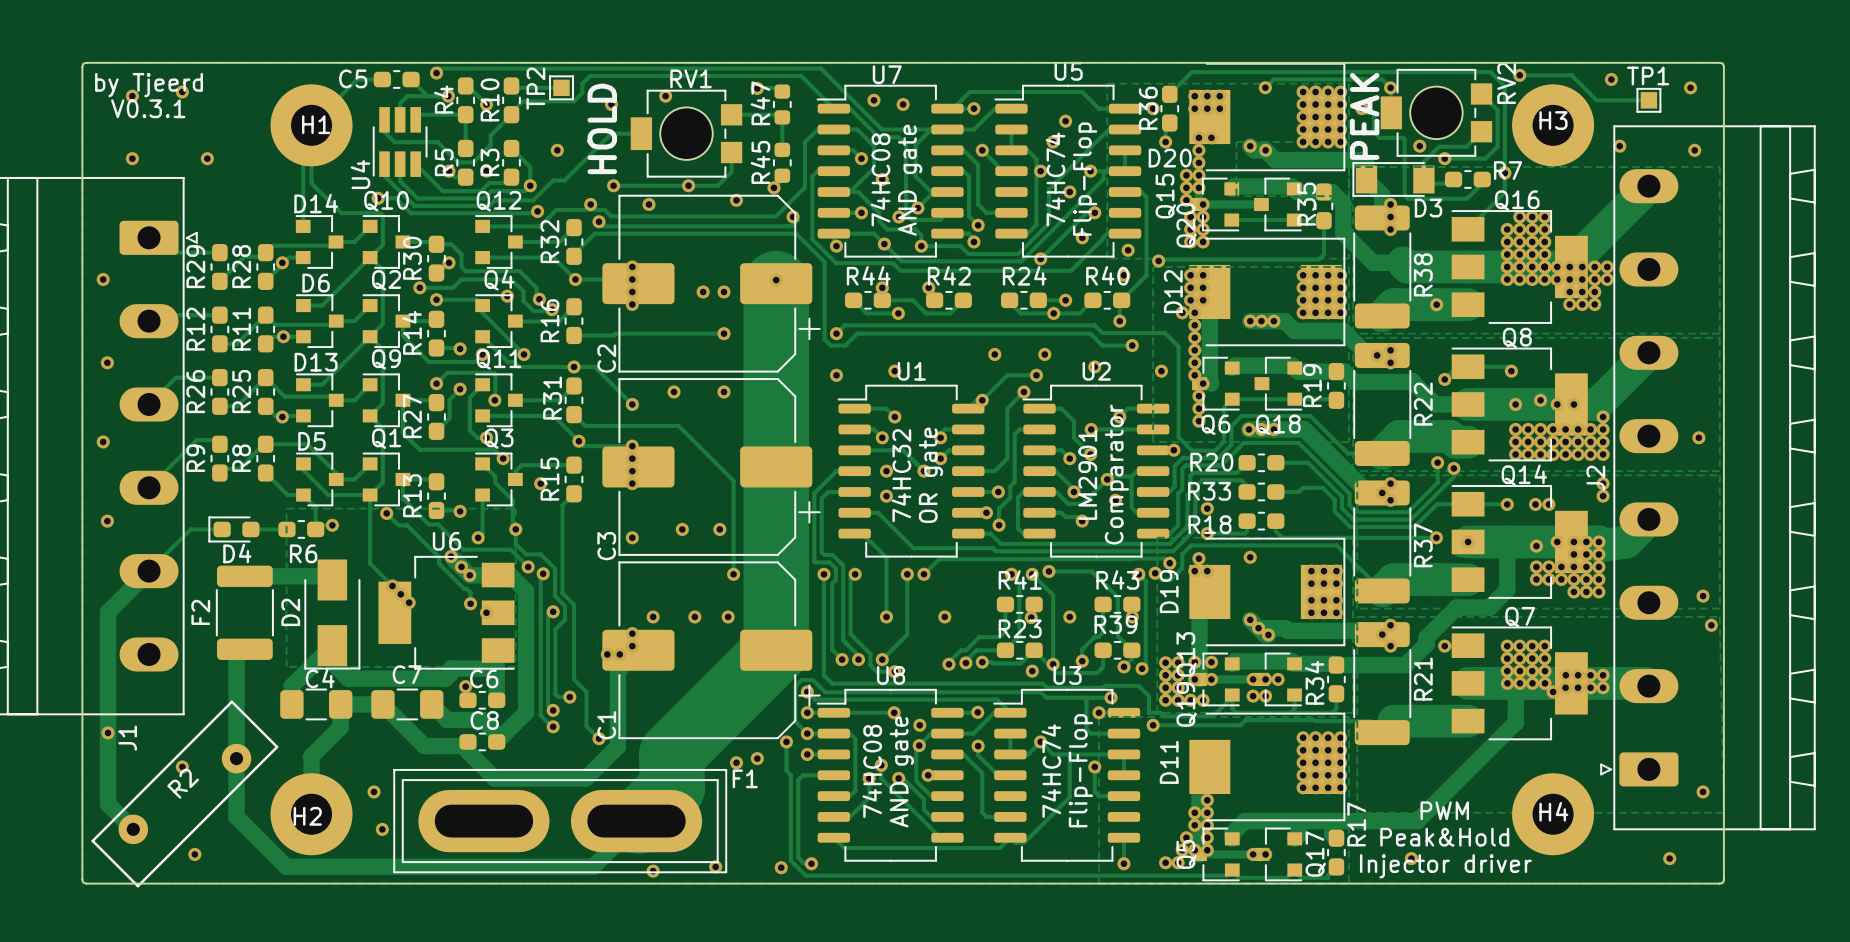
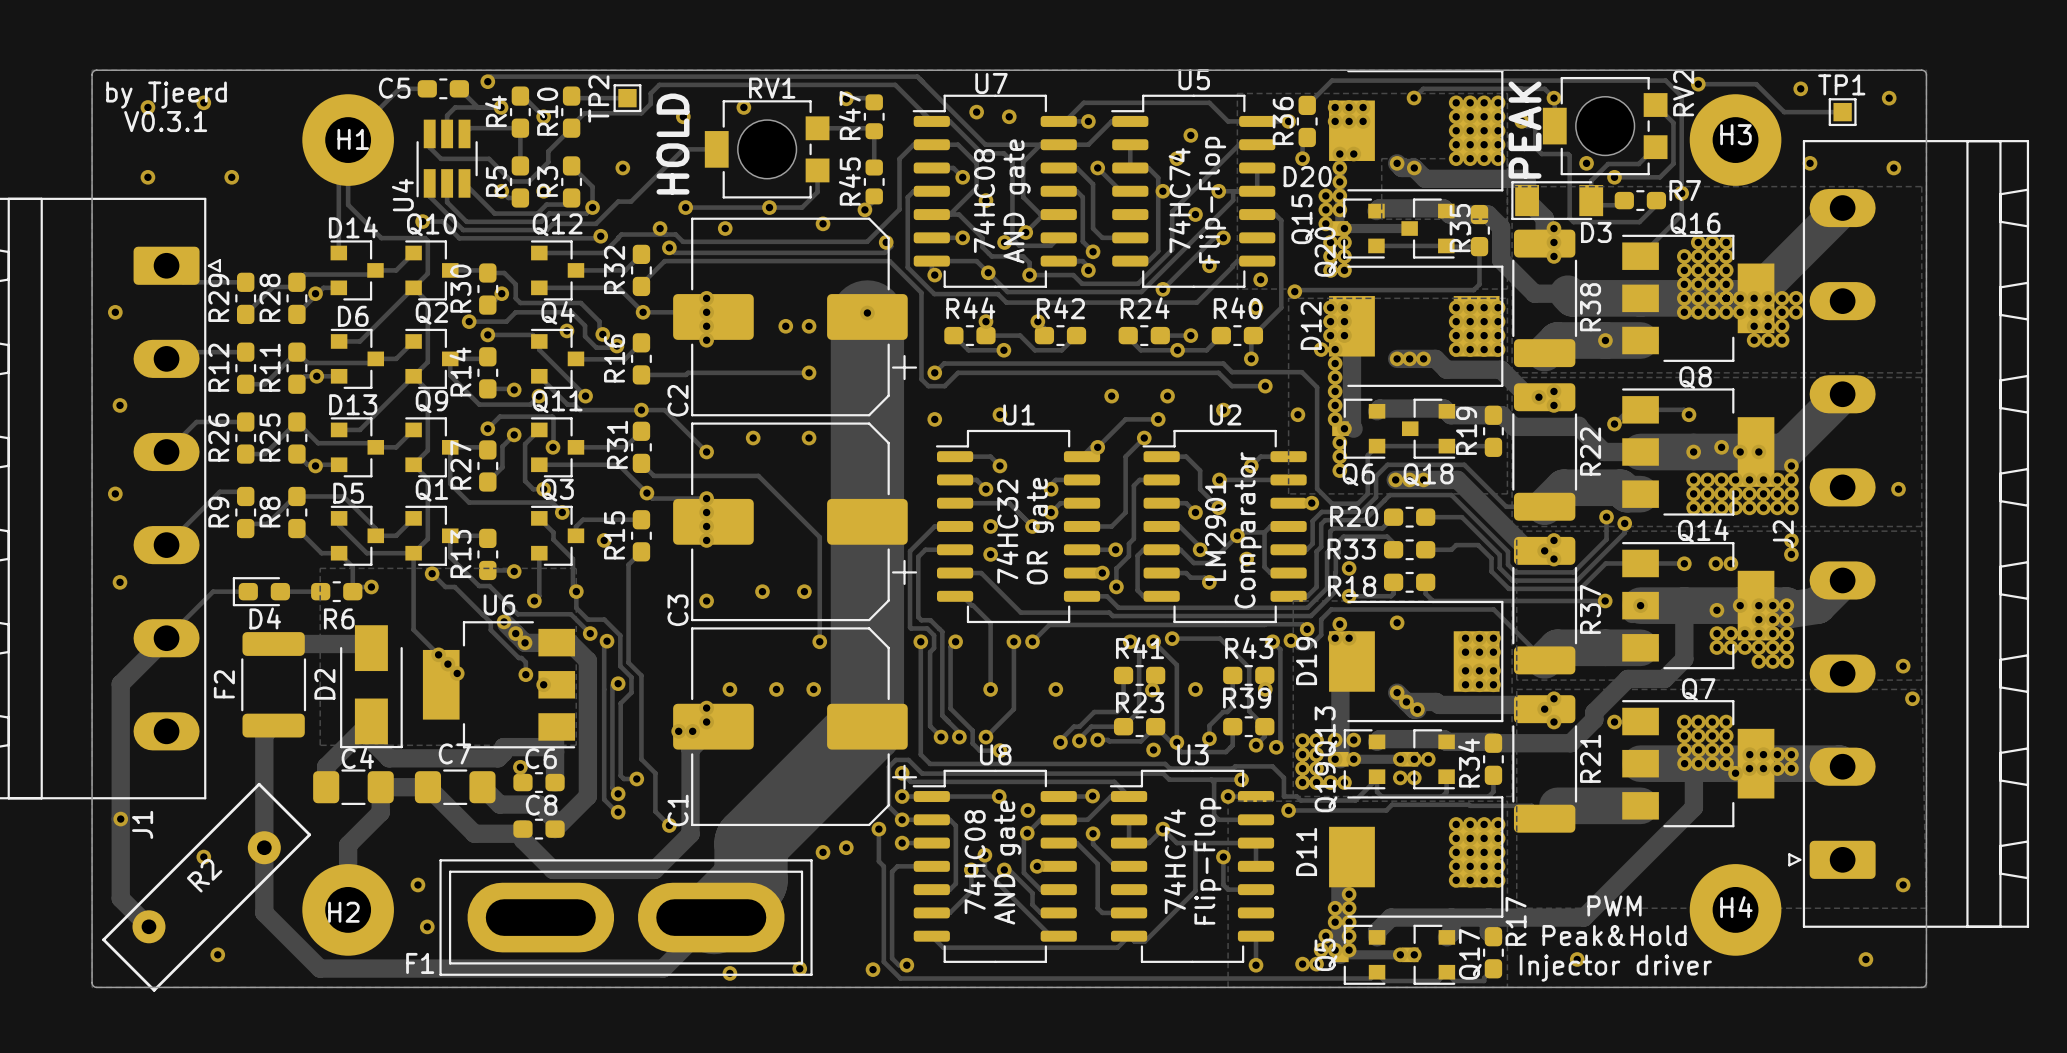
F1 name position: F1 (745, 778) -> F1 (420, 963)

